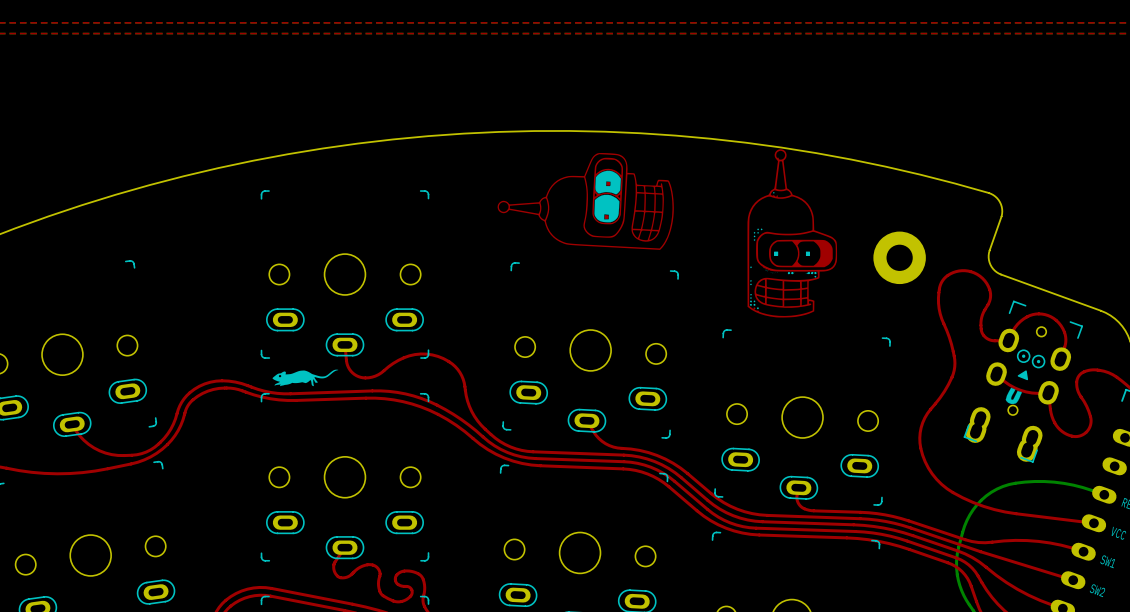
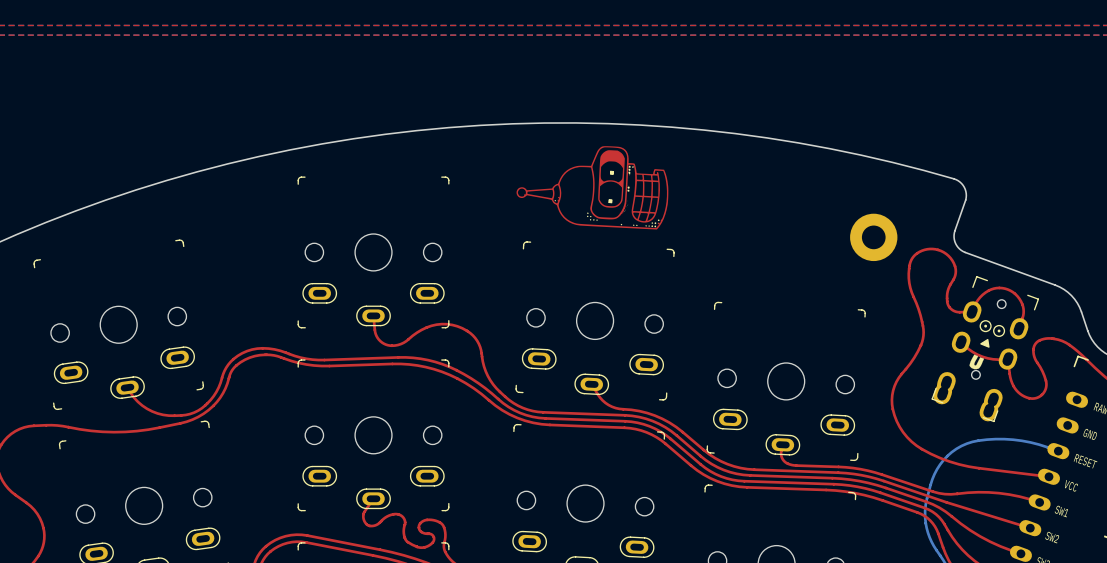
drawing: [747, 149, 838, 318] -> none
drawing shape: [497, 153, 674, 250] -> [516, 146, 669, 230]
drawing: [272, 369, 339, 387] -> none

